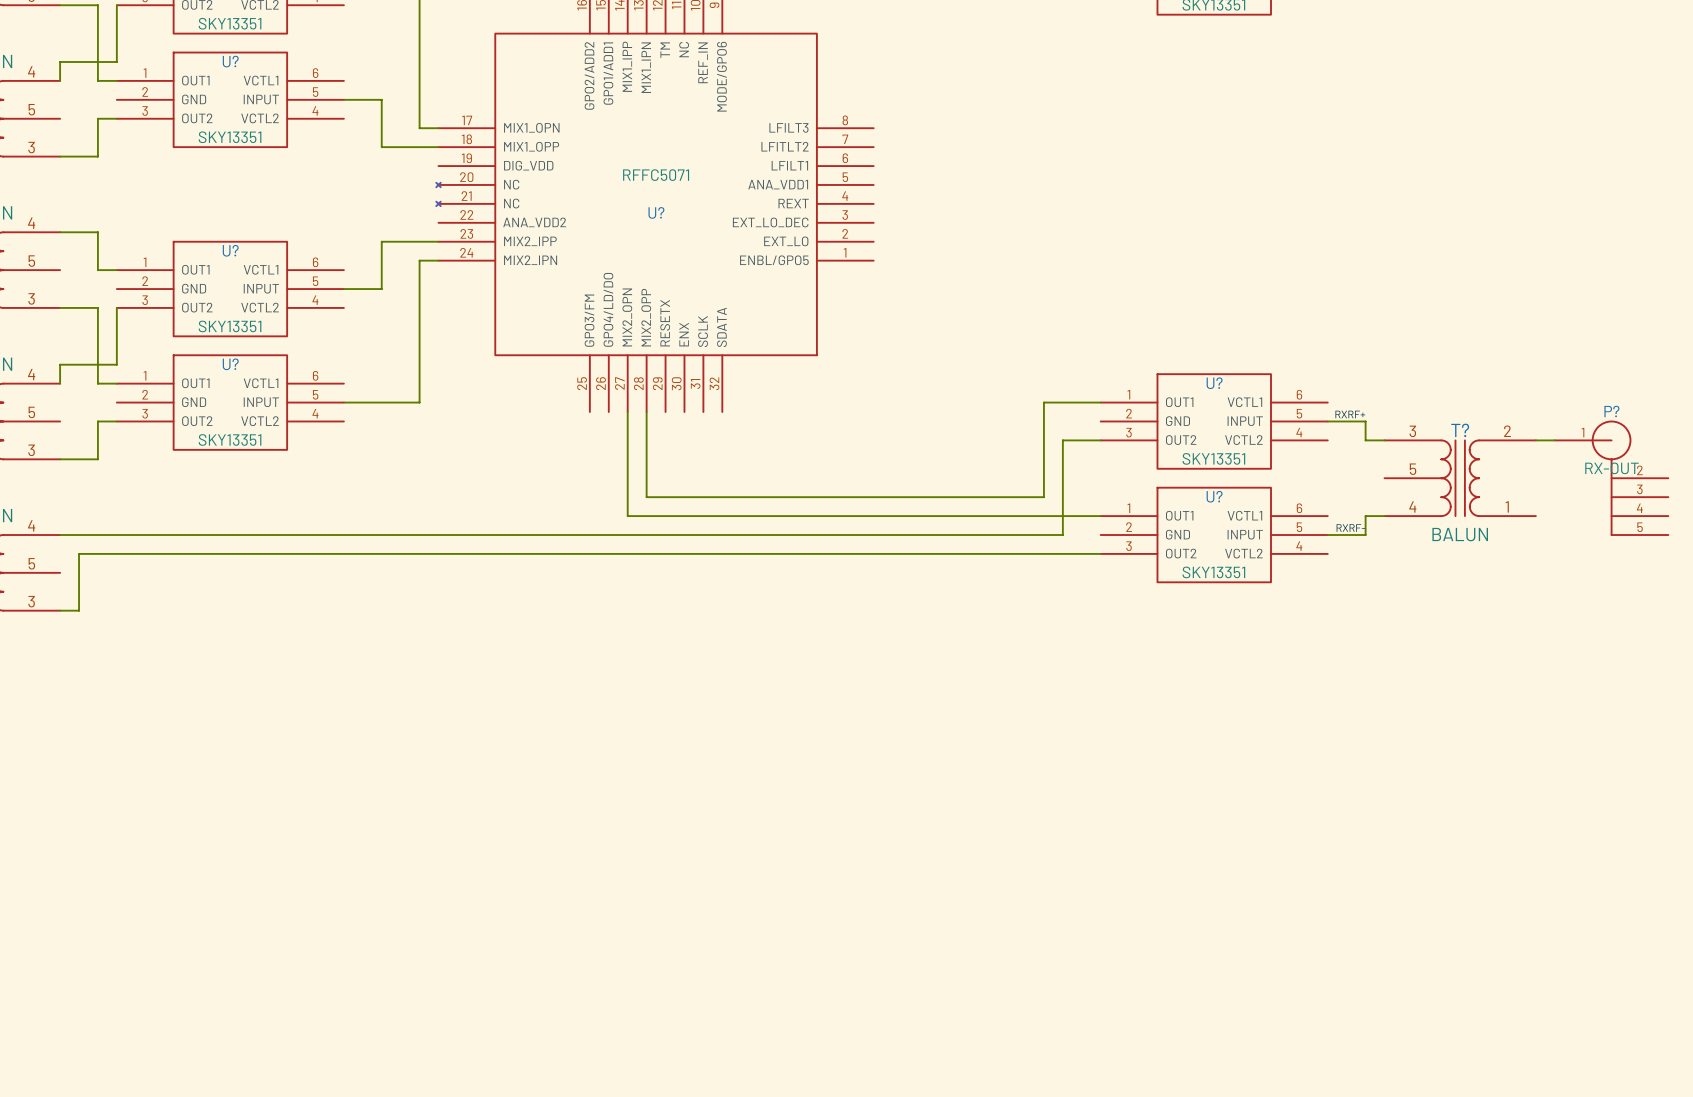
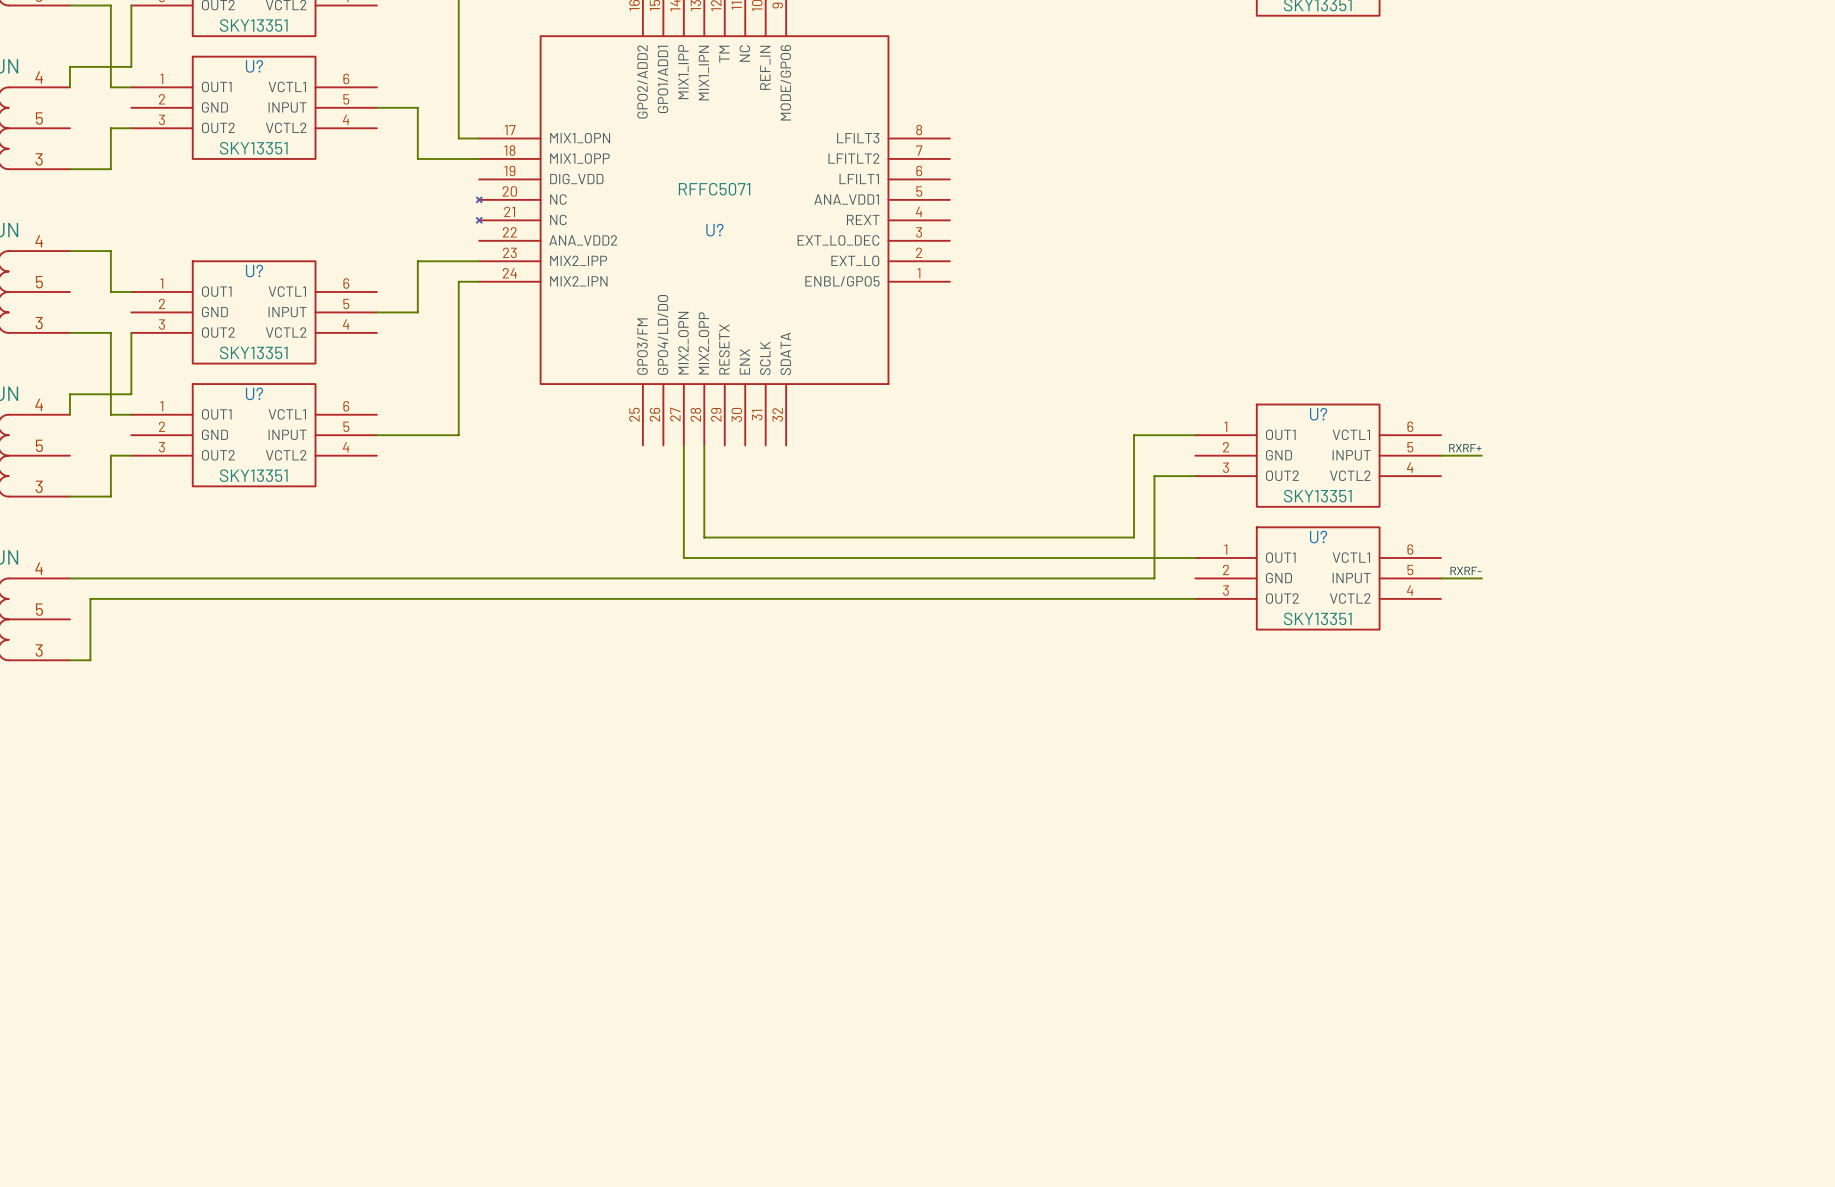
wire: (1365, 421) (1365, 440) (1384, 440) -> none
wire: (1535, 440) (1554, 440) -> none
T?: BALUN (1460, 478) -> none
P?: RX-OUT (1611, 478) -> none
wire: (1384, 516) (1365, 516) (1365, 535) -> none

